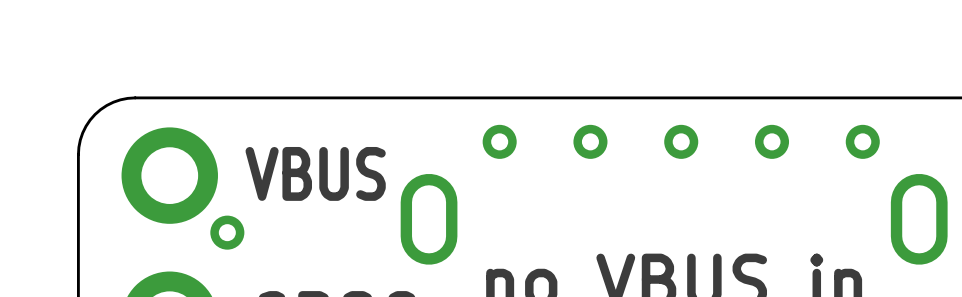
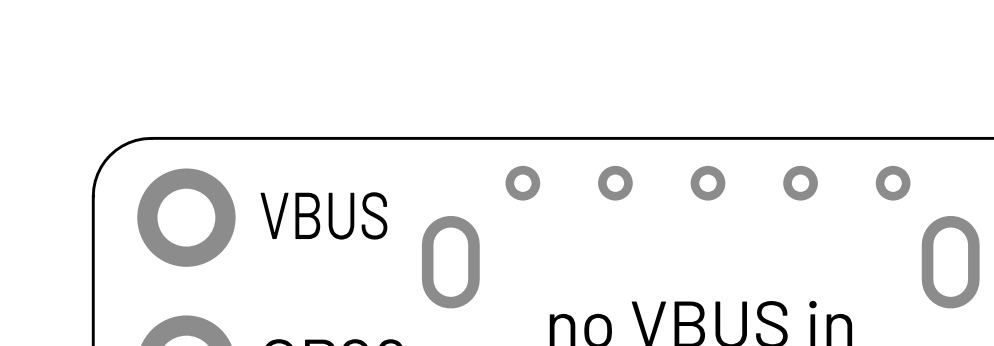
via: (227, 232) -> none

